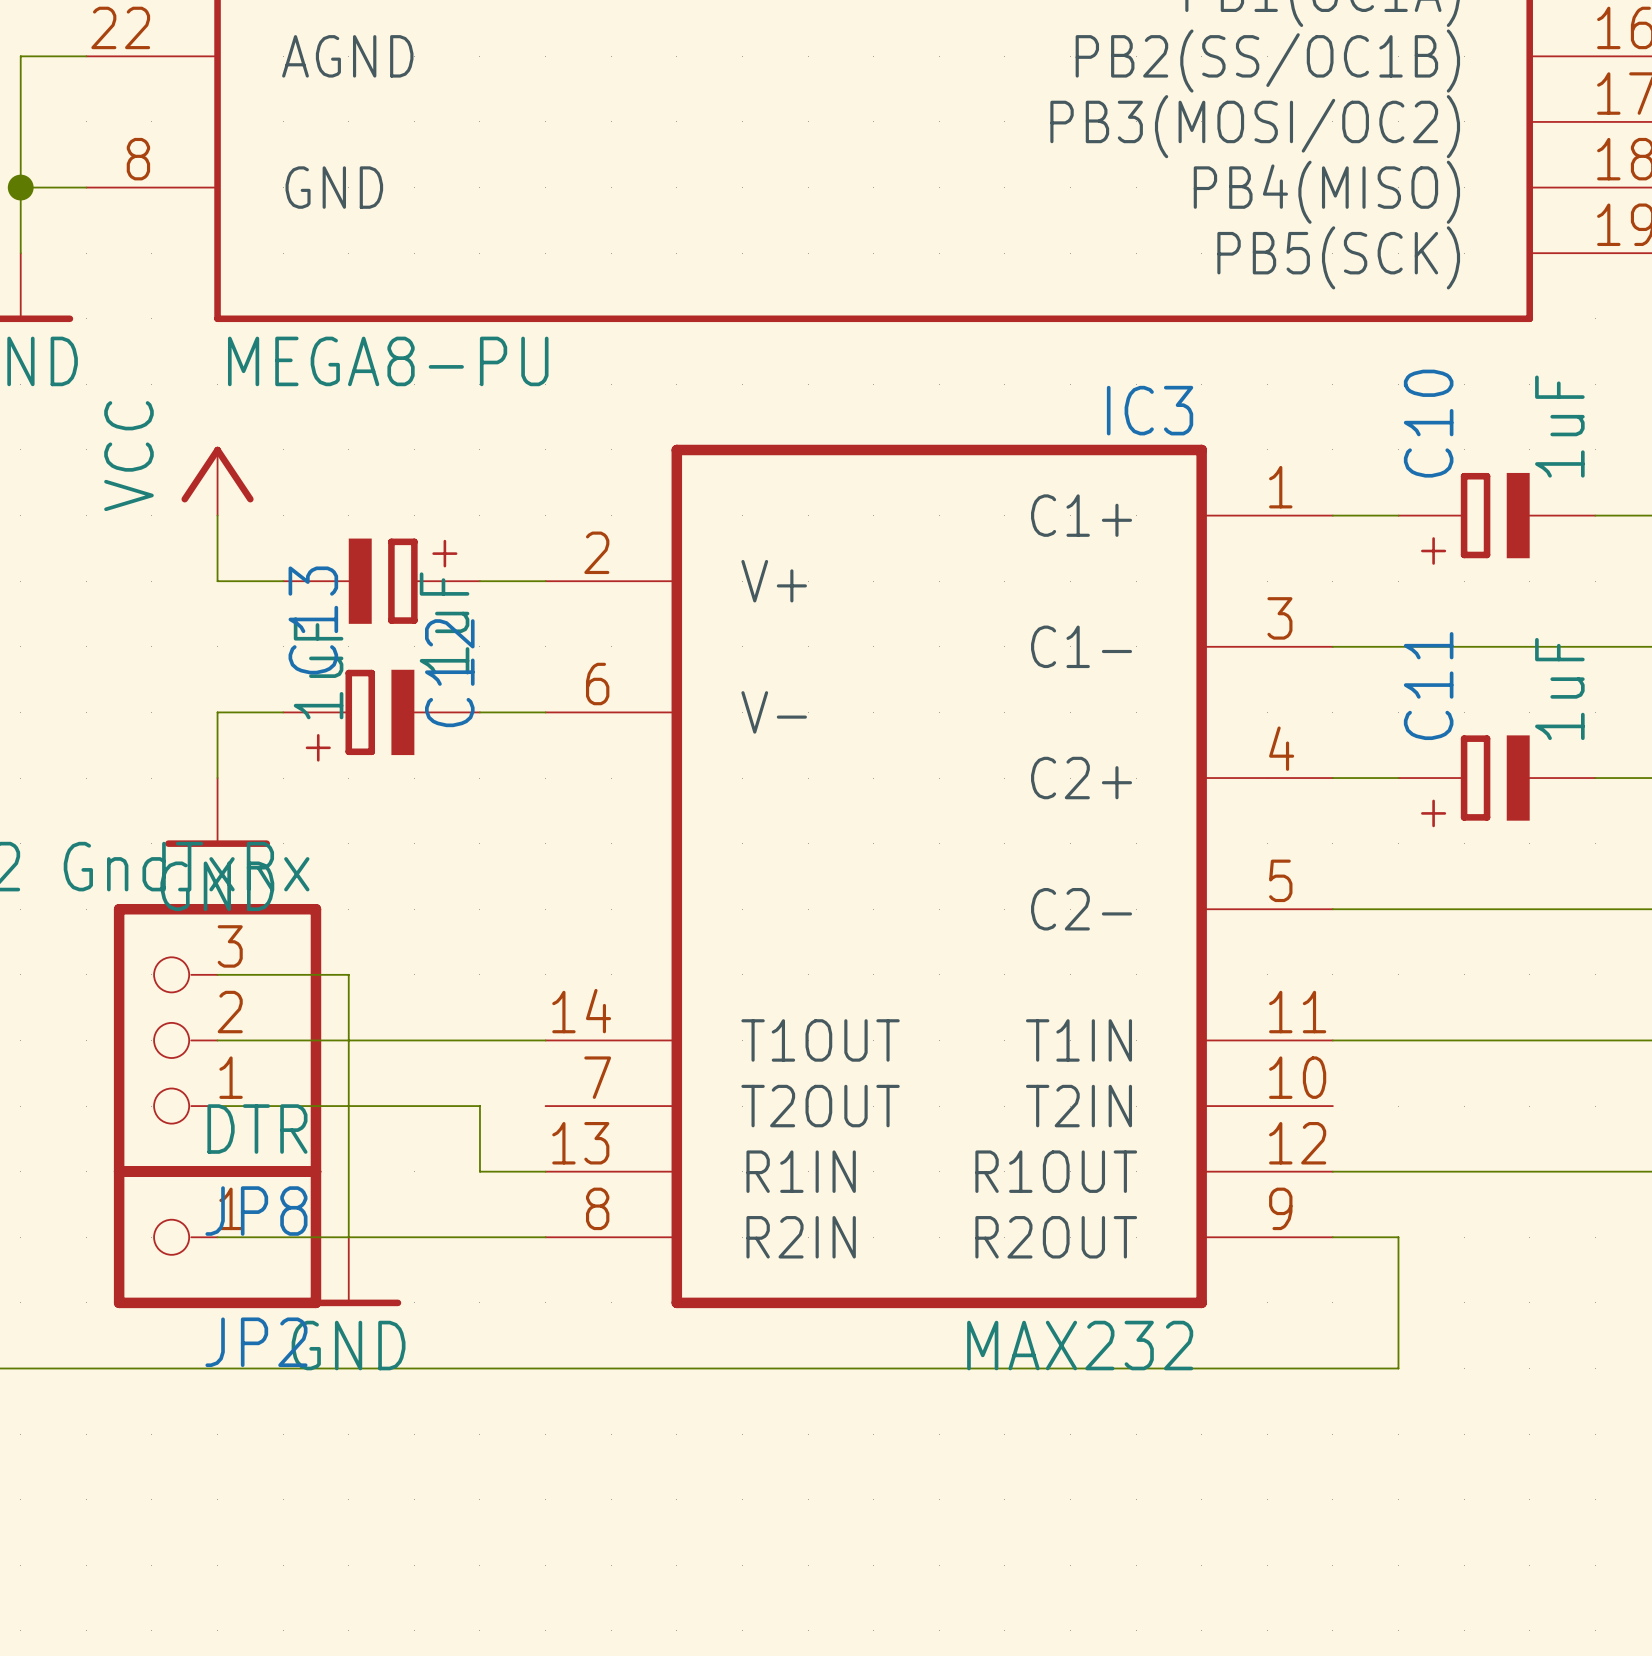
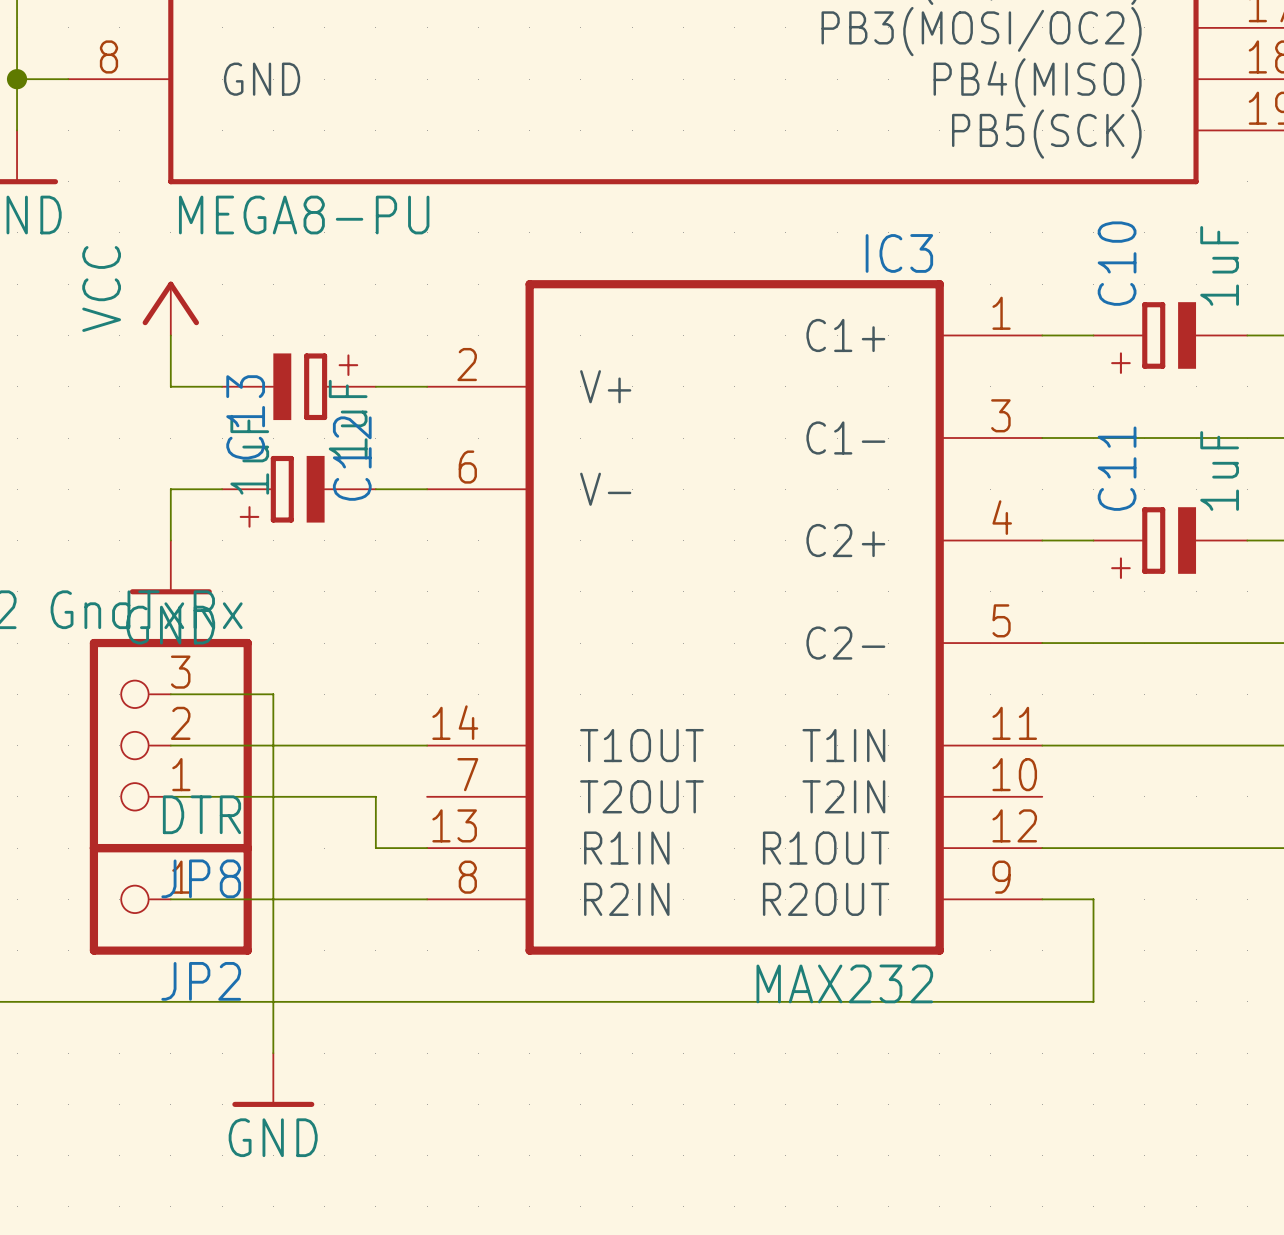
wire: none -> (273, 899) (273, 1053)
power symbol position: GND (348, 1271) -> GND (273, 1080)

